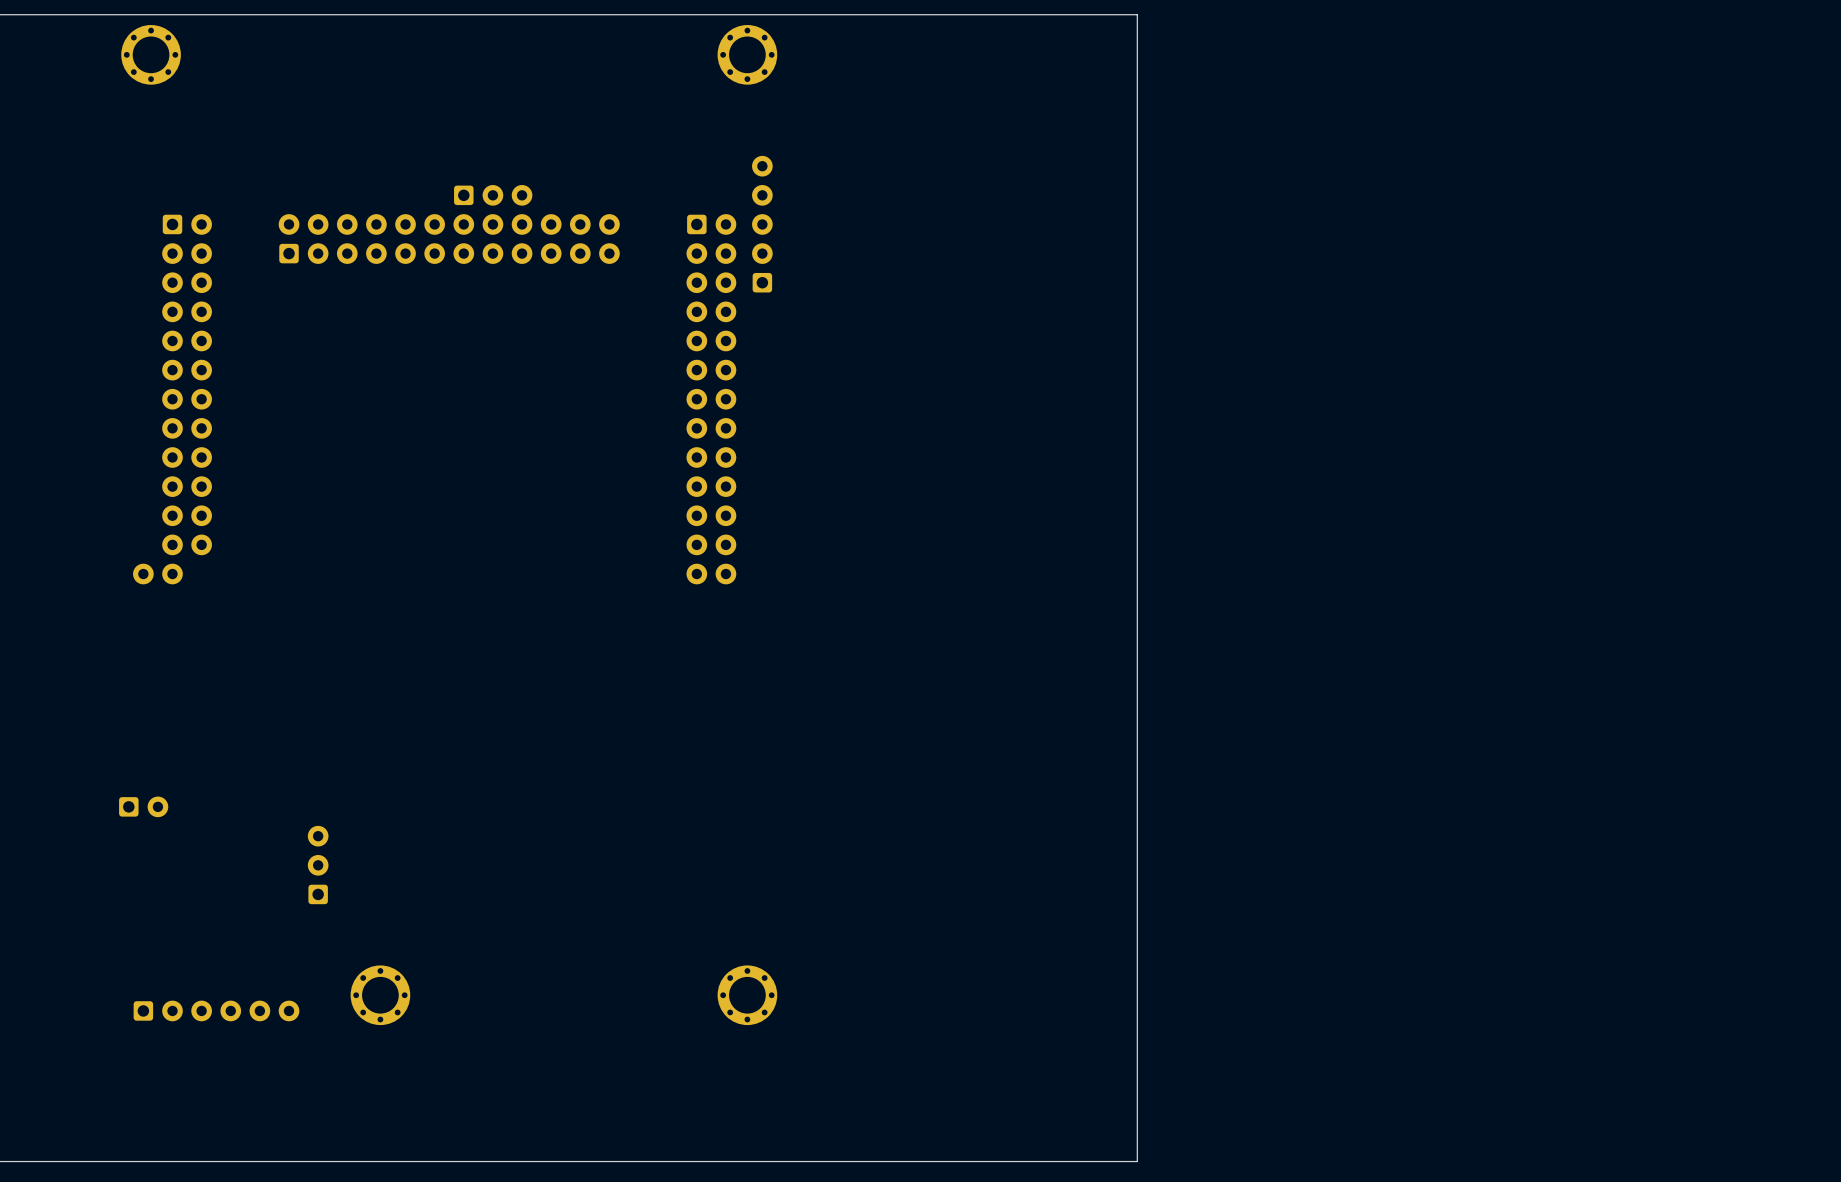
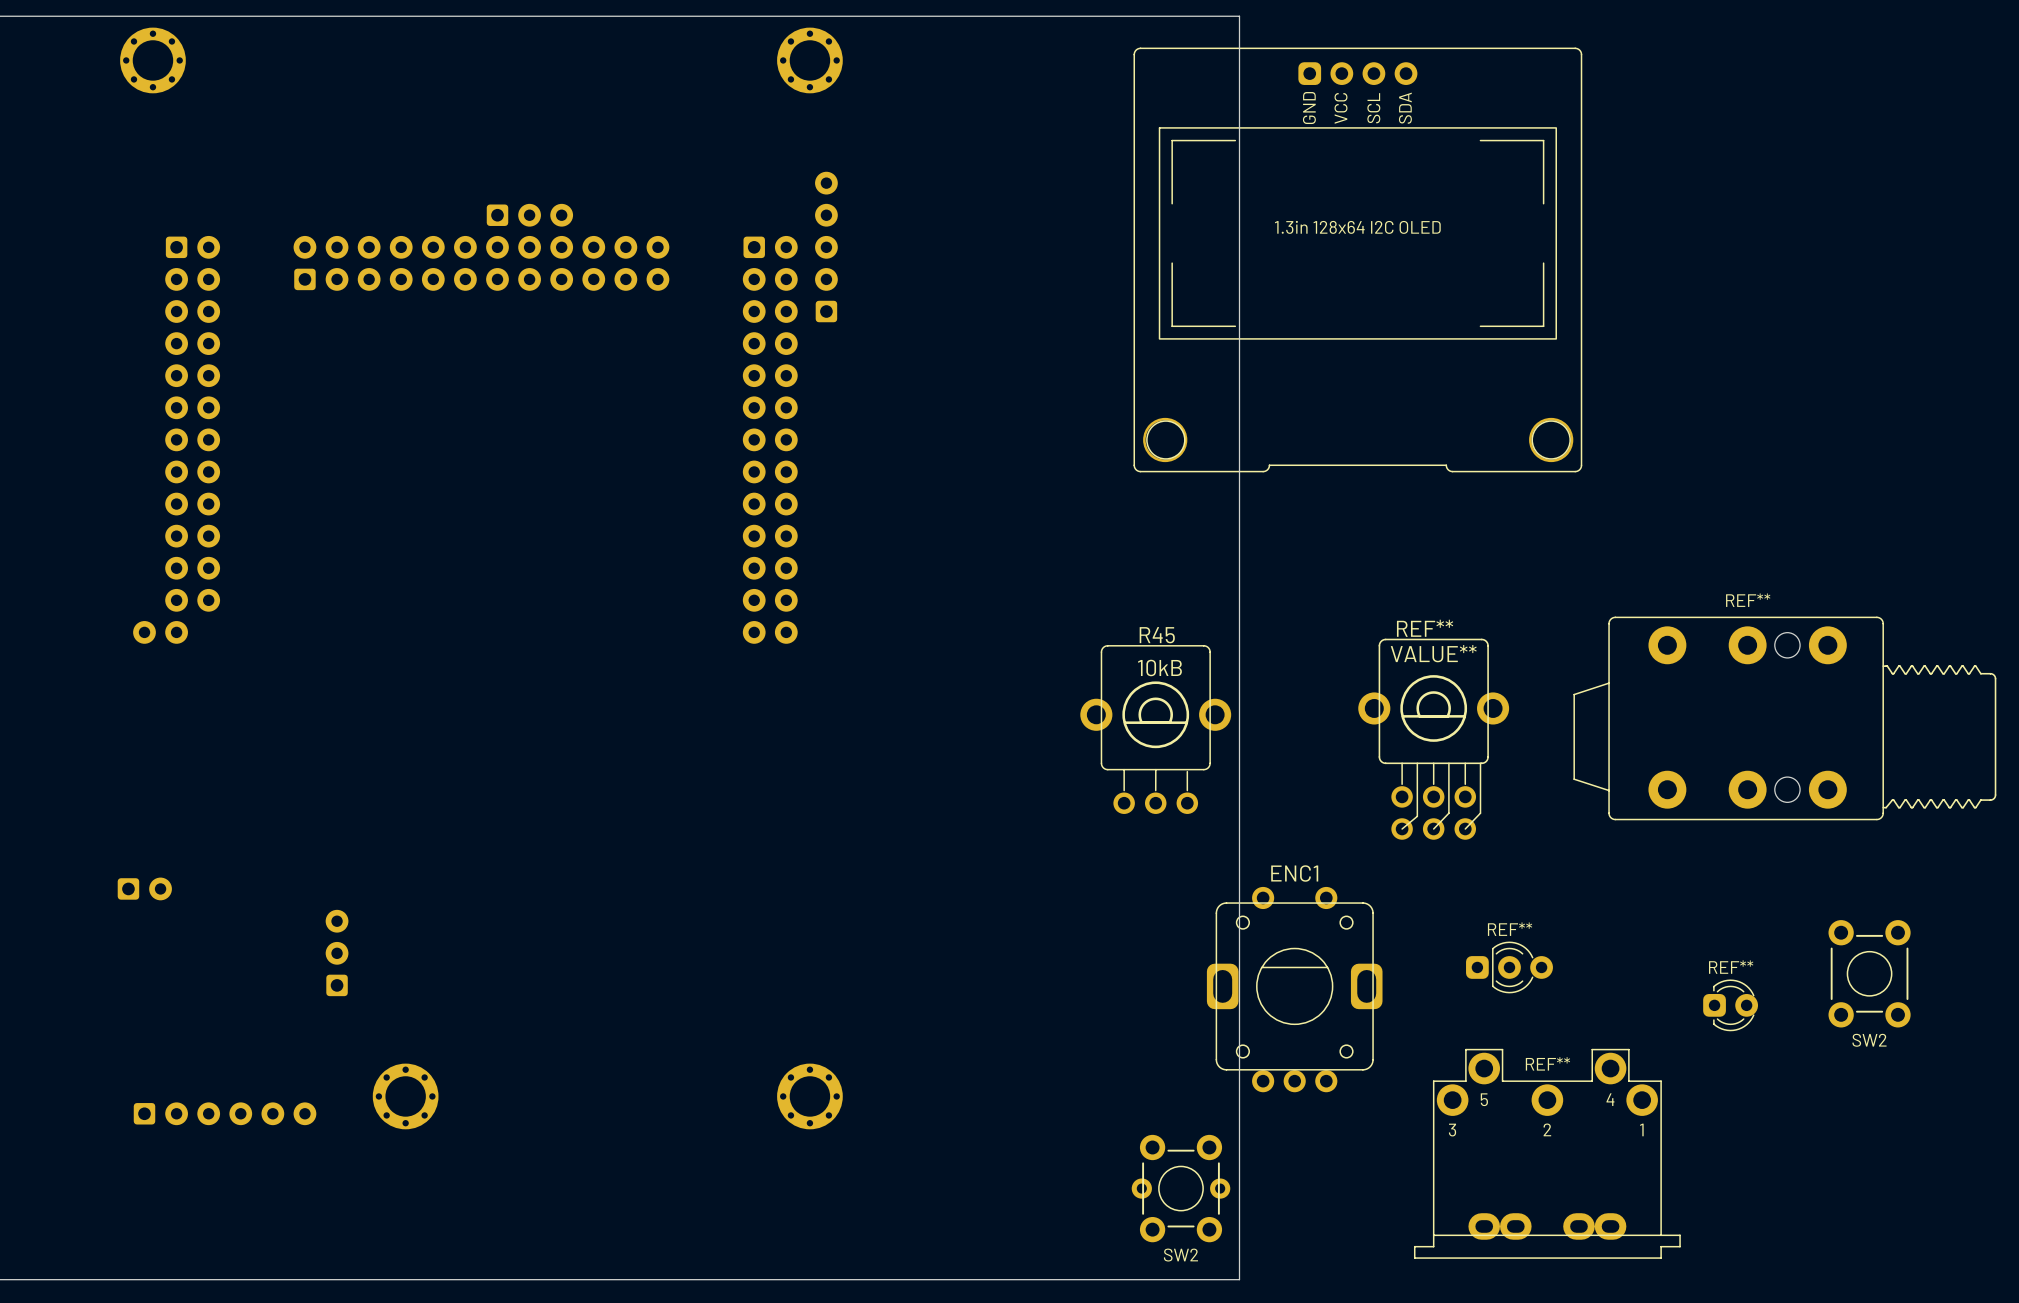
part: none -> (1357, 259)
REF**: none -> (1784, 718)
R45: none -> 10kB (1155, 729)
REF**: none -> VALUE** (1433, 739)
REF**: none -> (1509, 967)
SW2: none -> (1869, 973)
ENC1: none -> (1294, 989)
REF**: none -> (1730, 1005)
part: none -> REF** (1547, 1153)
SW2: none -> (1181, 1188)

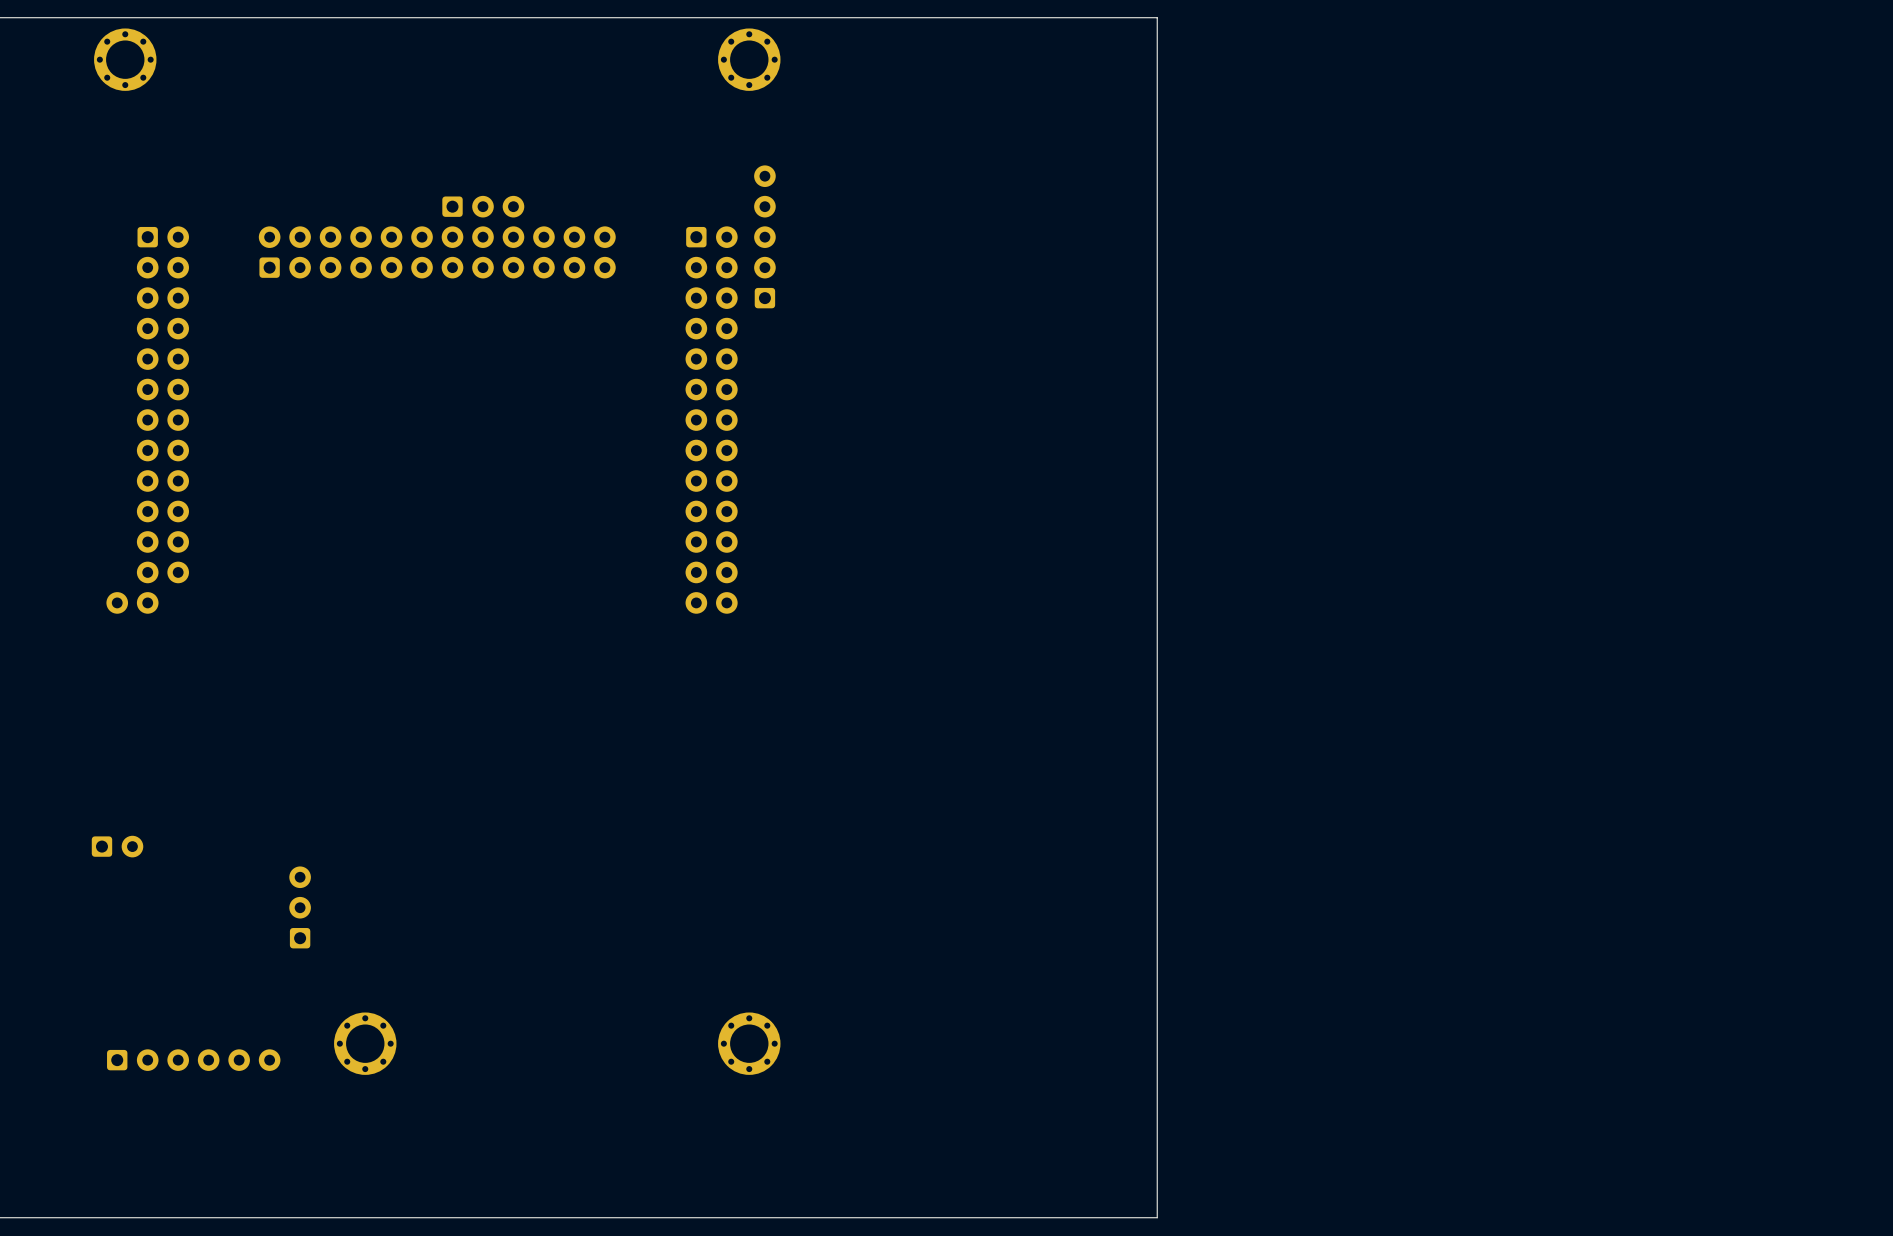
part: (1357, 259) -> none
REF**: (1784, 718) -> none
R45: 10kB (1155, 729) -> none
REF**: VALUE** (1433, 739) -> none
REF**: (1509, 967) -> none
SW2: (1869, 973) -> none
ENC1: (1294, 989) -> none
REF**: (1730, 1005) -> none
part: REF** (1547, 1153) -> none
SW2: (1181, 1188) -> none

